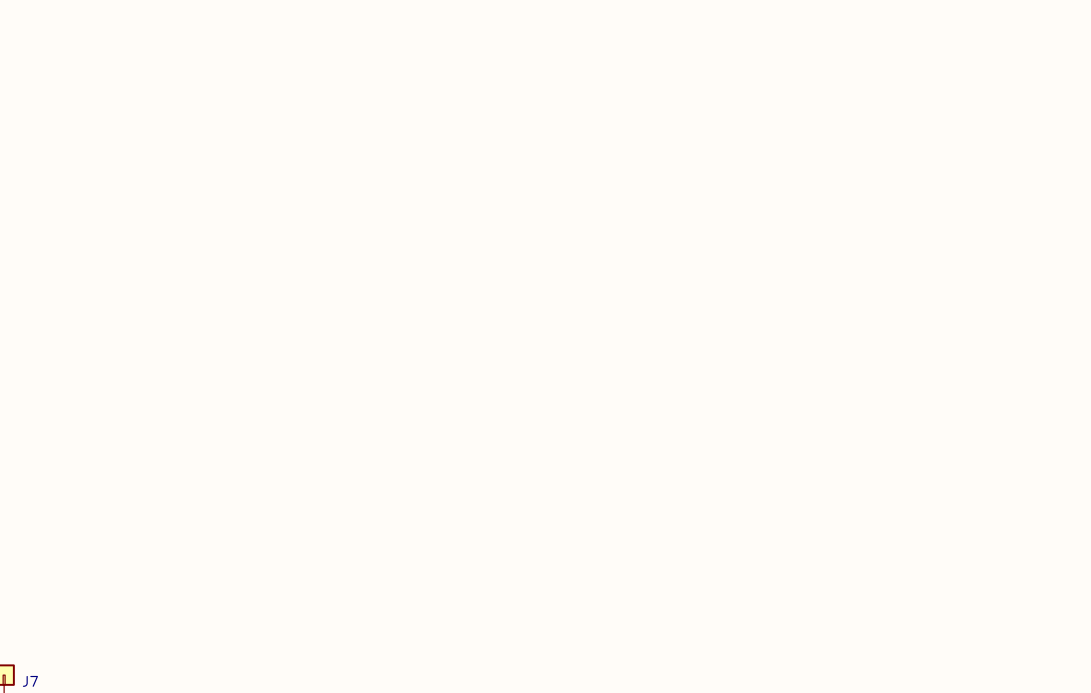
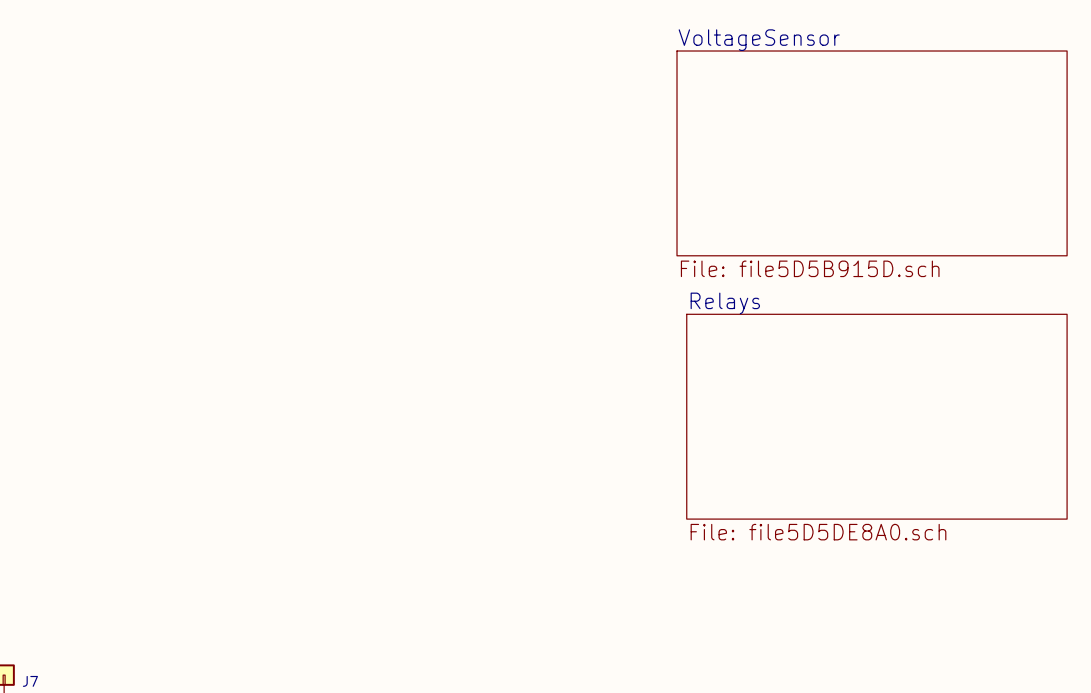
sheet VoltageSensor: none -> File: file5D5B915D.sch (872, 153)
sheet Relays: none -> File: file5D5DE8A0.sch (876, 416)

